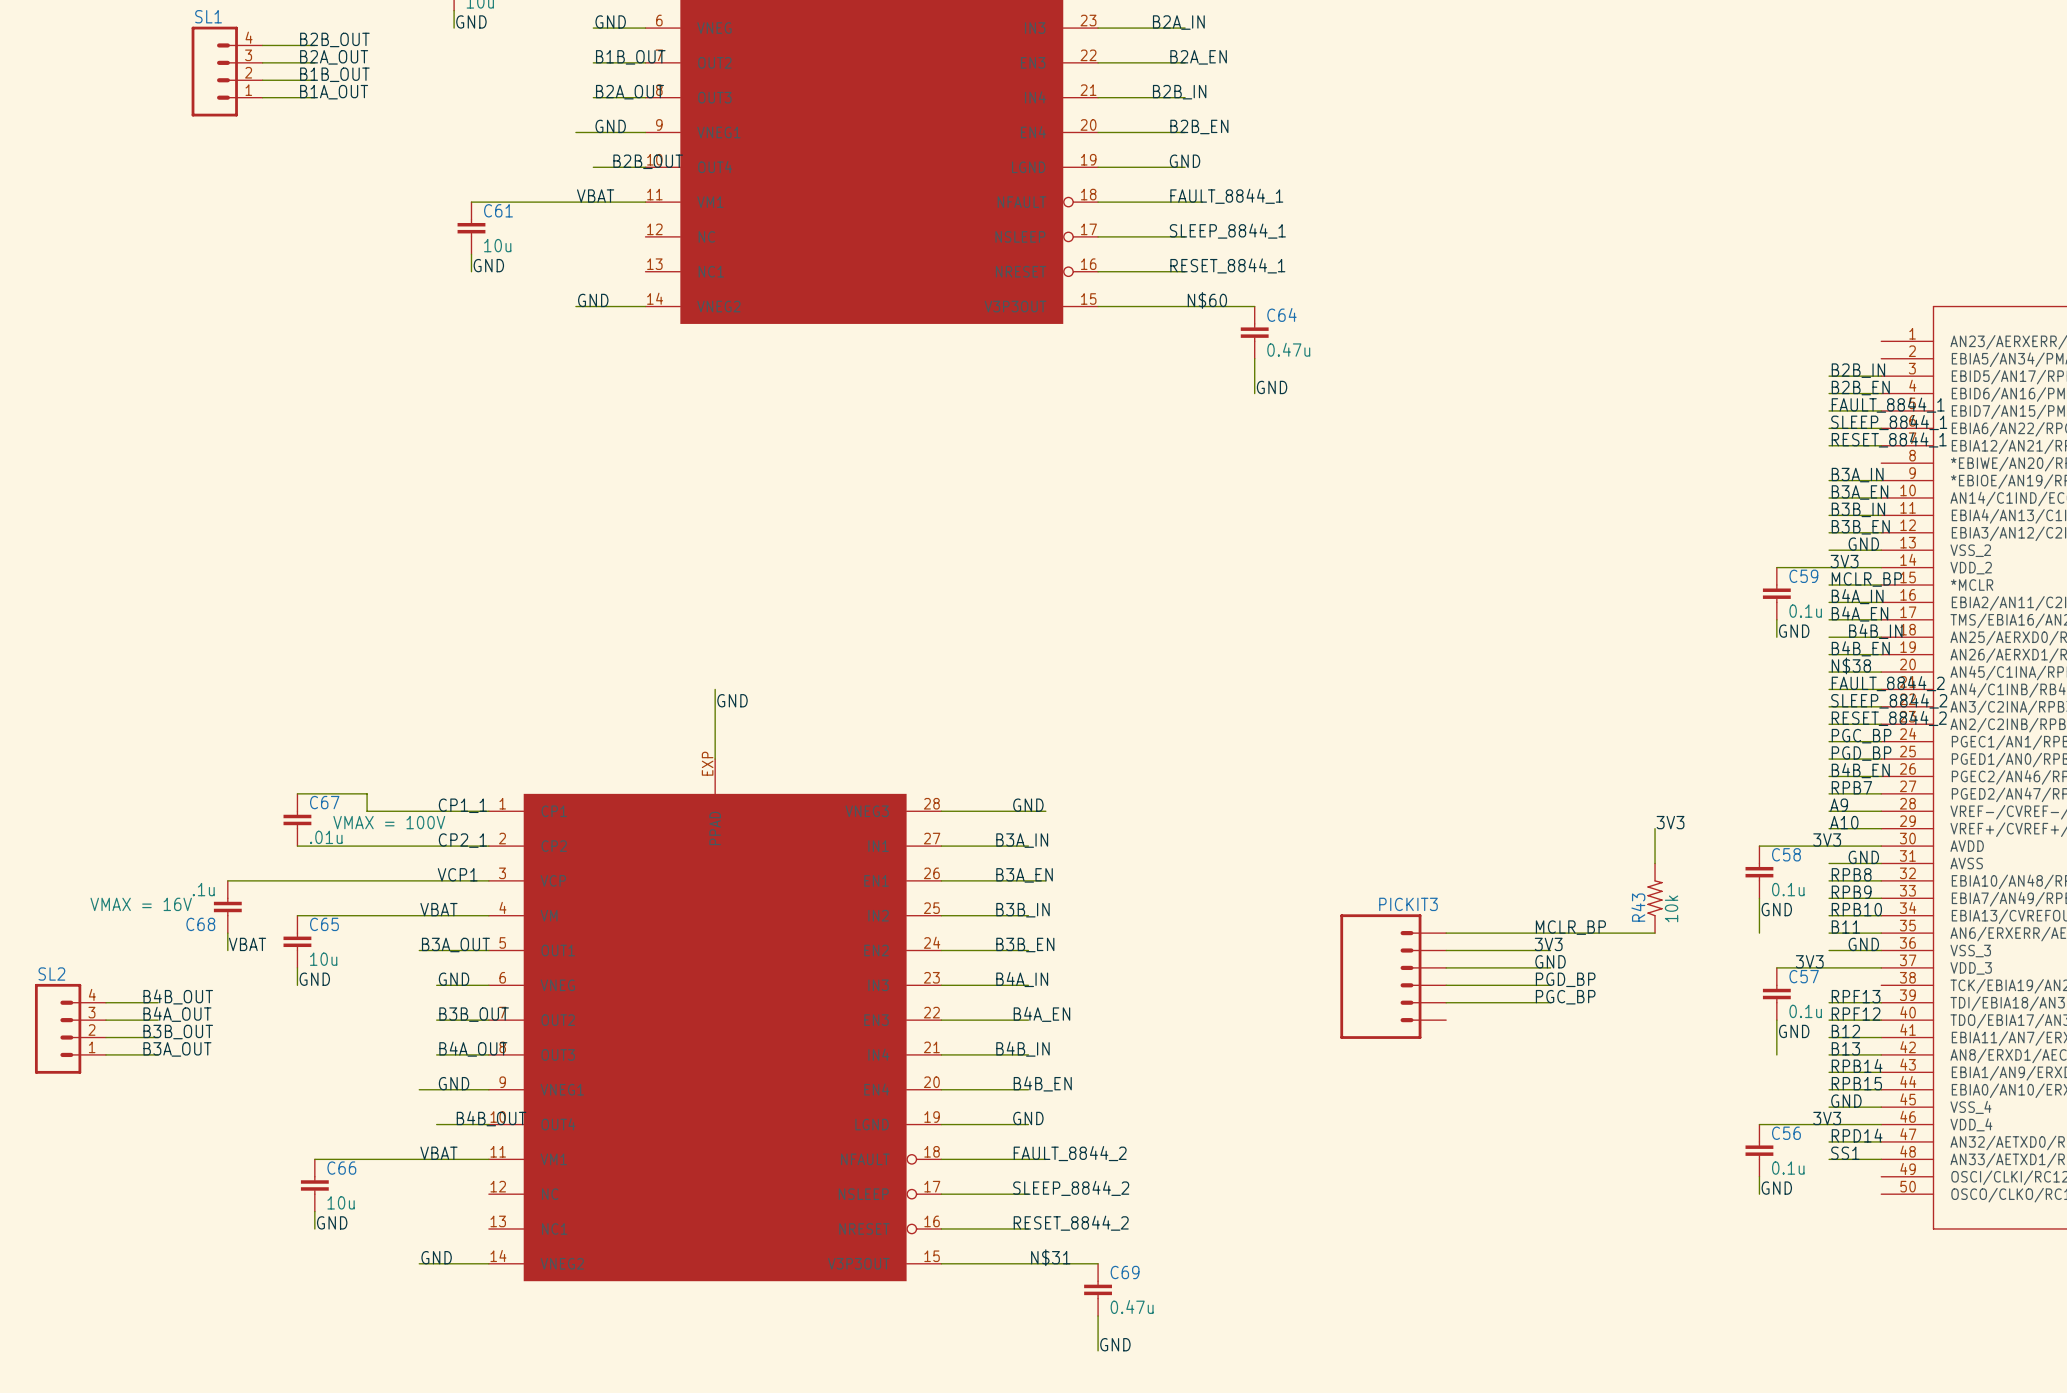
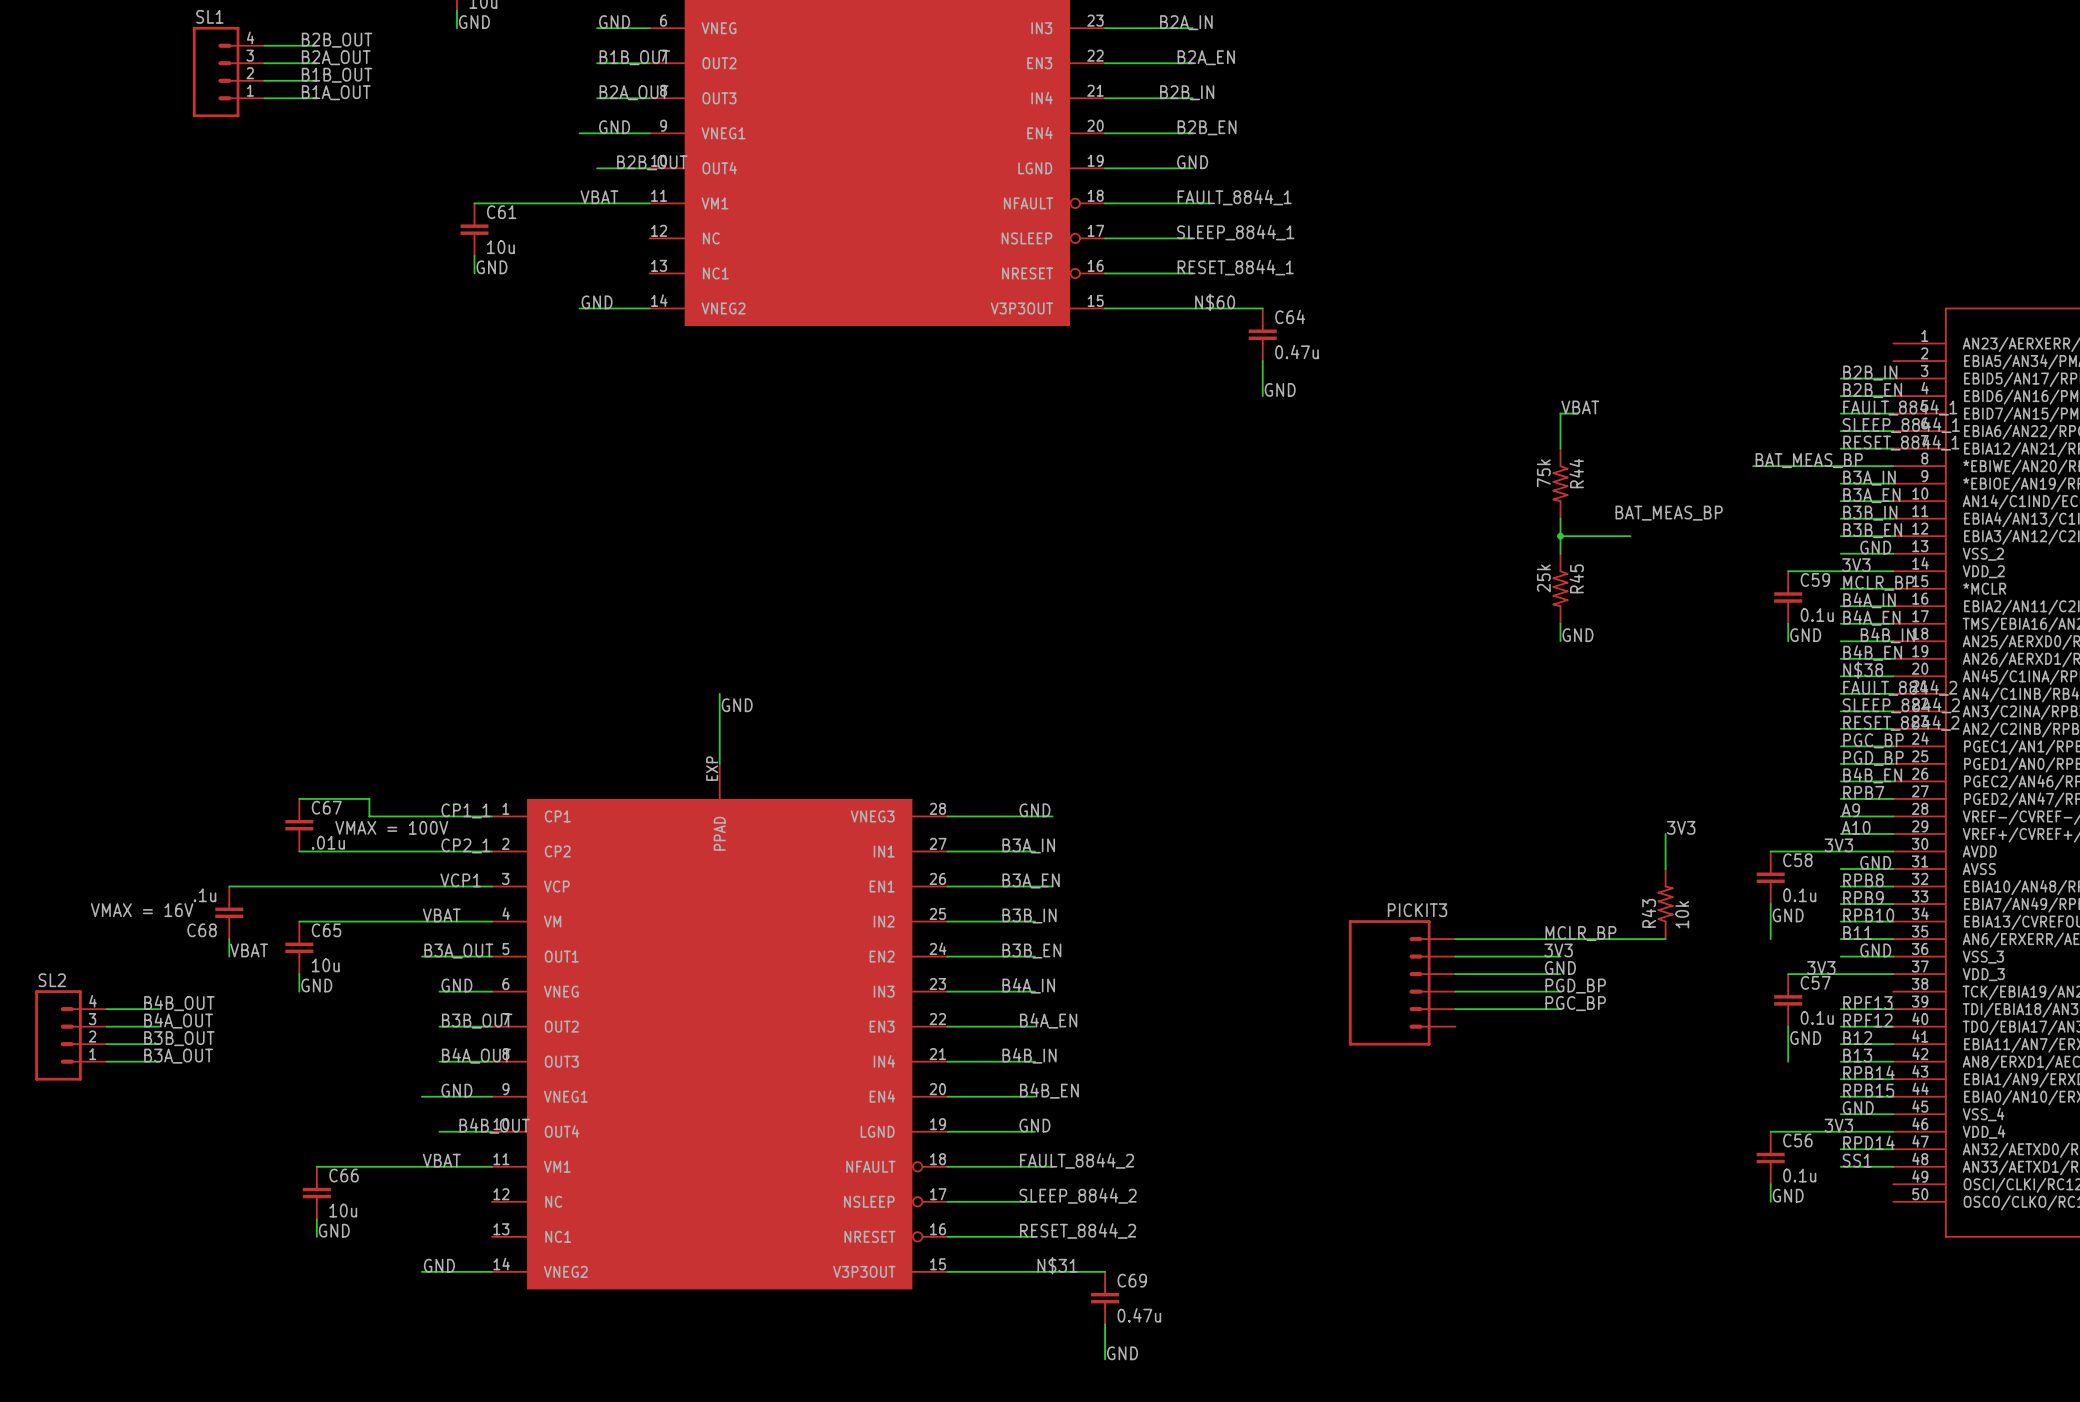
label: none -> VBAT (1580, 407)
wire: none -> (1578, 413) (1560, 413) (1560, 448)
label: none -> BAT_MEAS_BP (1809, 460)
wire: none -> (1753, 466) (1893, 466)
R44: none -> 75k (1560, 483)
label: none -> BAT_MEAS_BP (1669, 513)
wire: none -> (1560, 518) (1560, 553)
wire: none -> (1560, 536) (1630, 536)
junction: none -> (1560, 536)
R45: none -> 25k (1560, 588)
wire: none -> (1560, 623) (1560, 641)
label: none -> GND (1577, 635)

